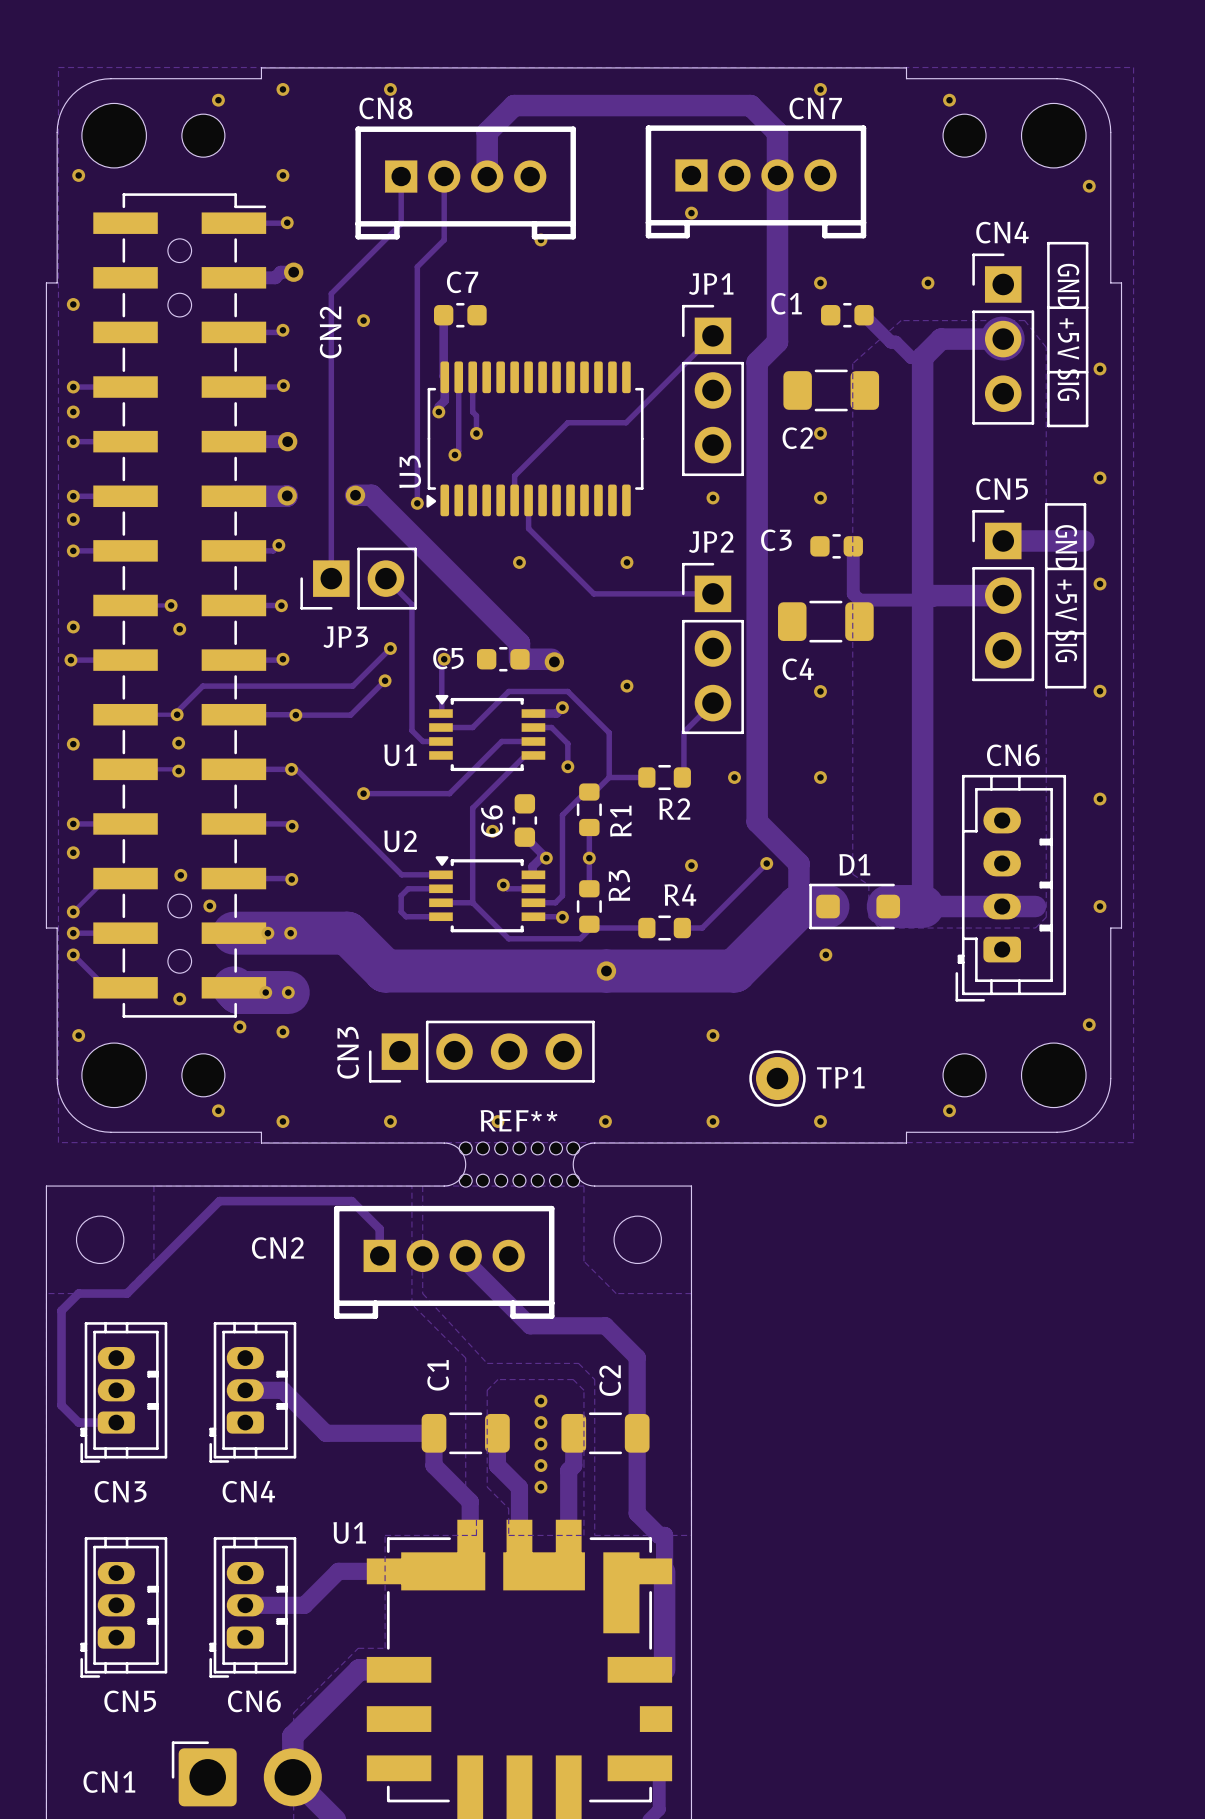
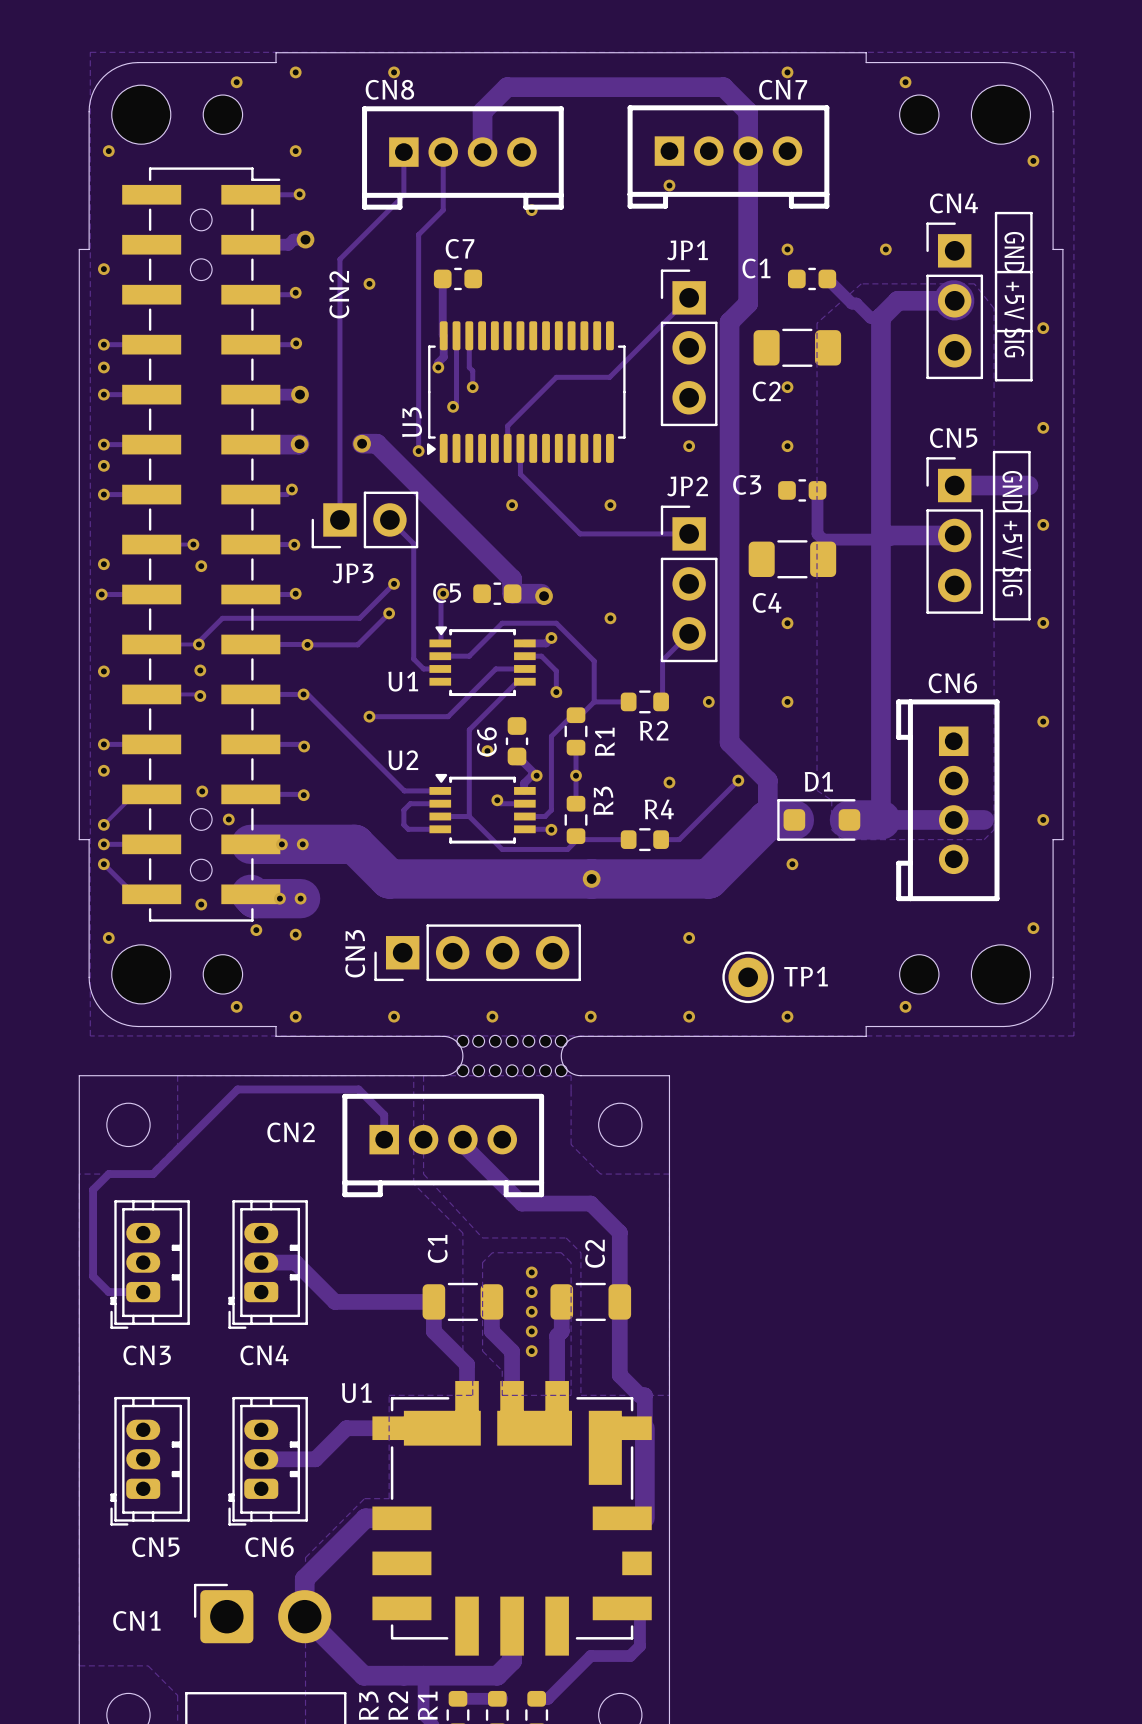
CN6 footprint: [955, 774, 1067, 1002] -> [896, 699, 1000, 902]
REF** name: REF** (519, 1120) -> none

